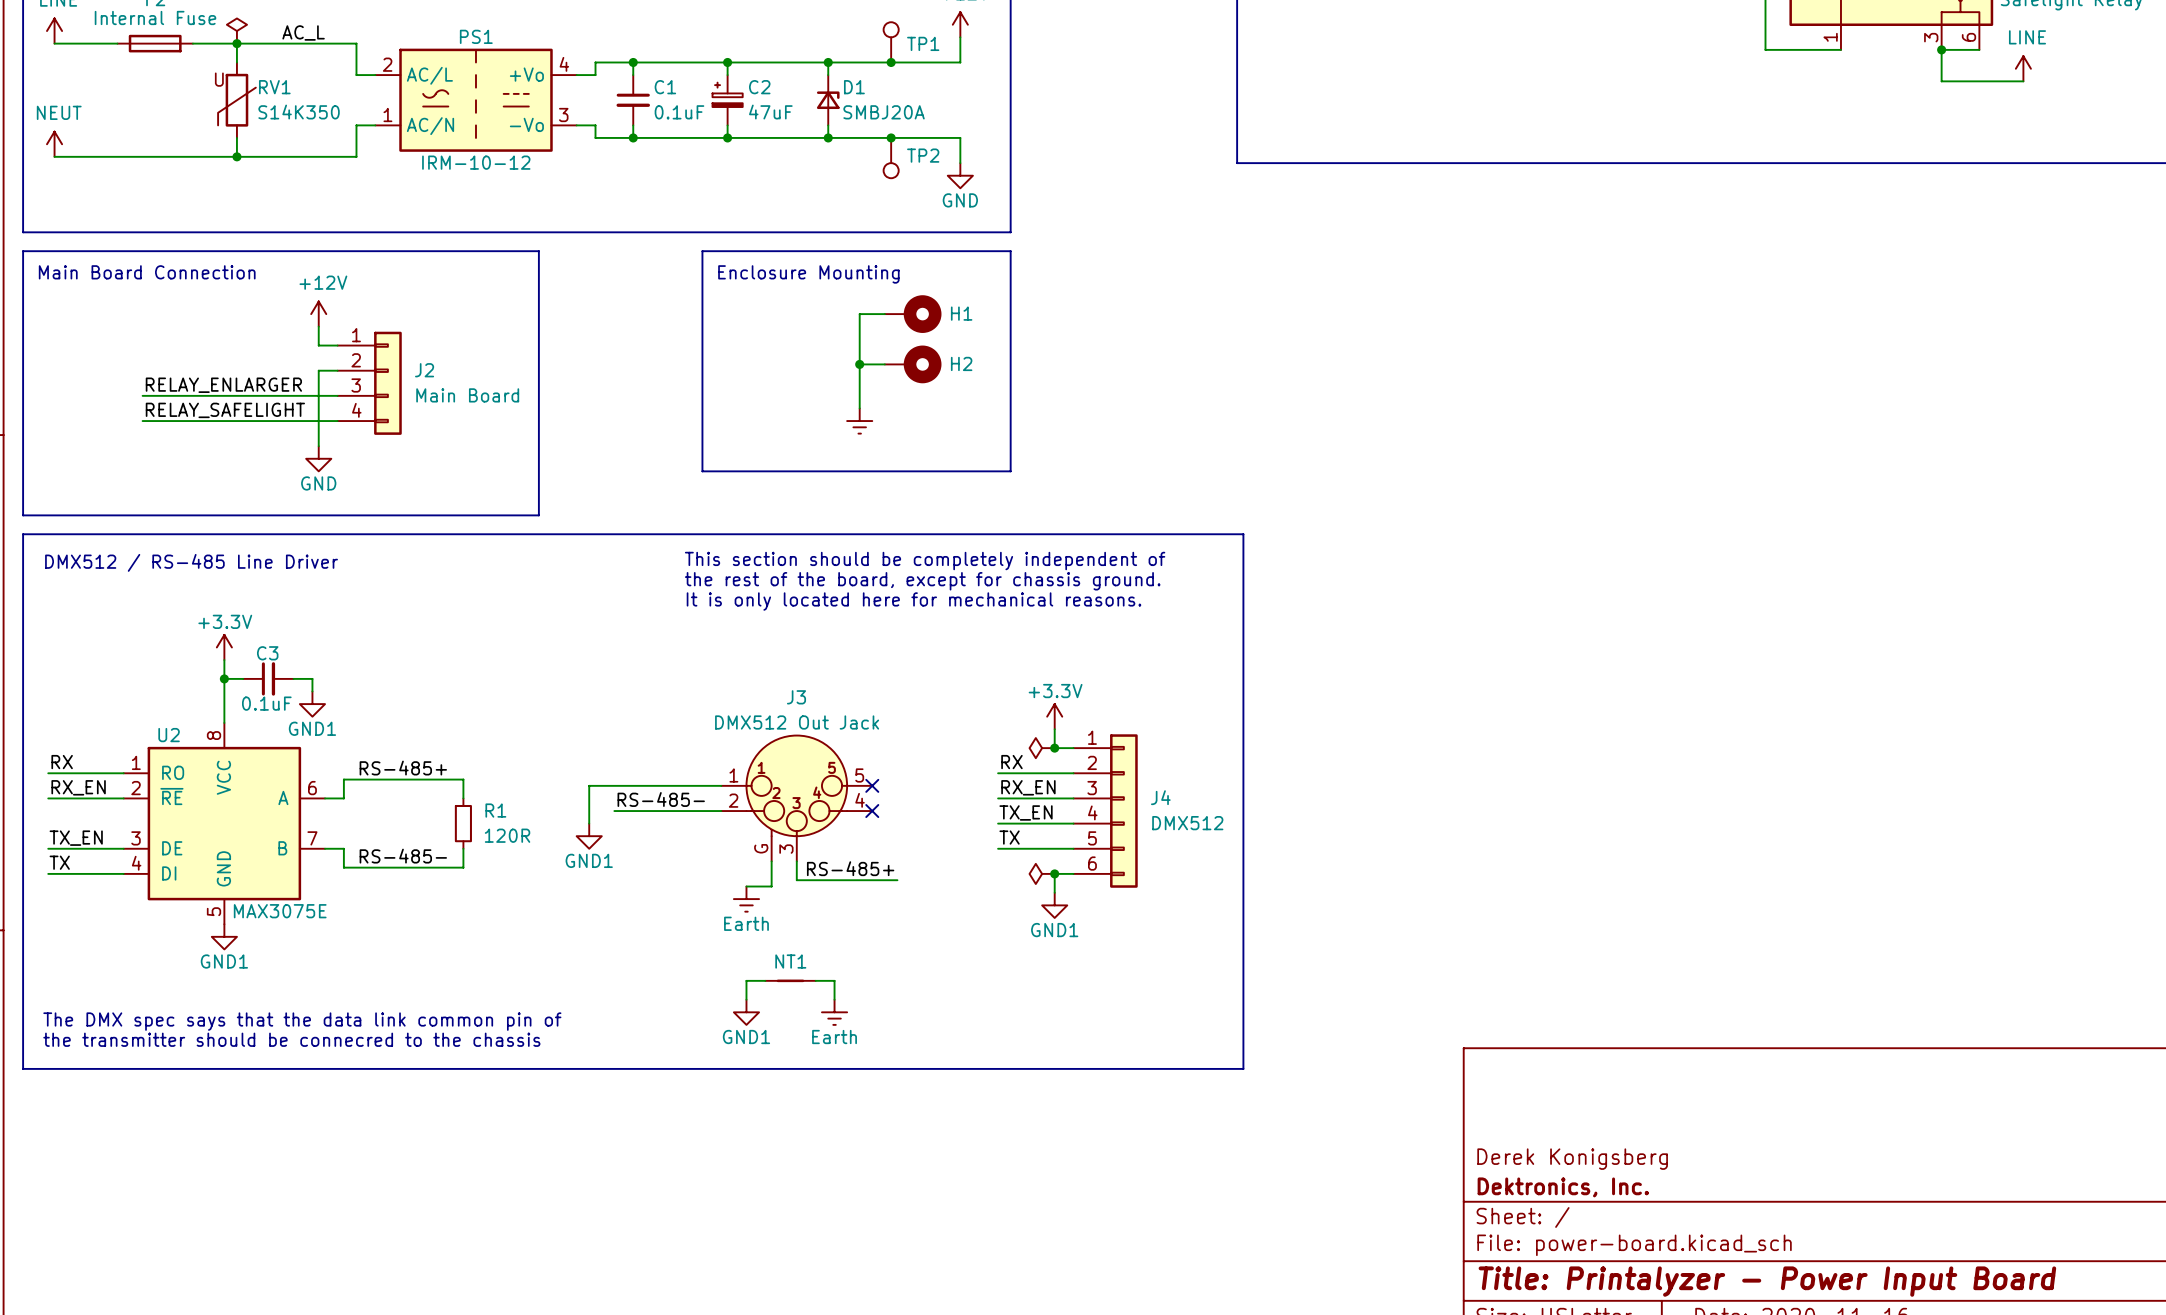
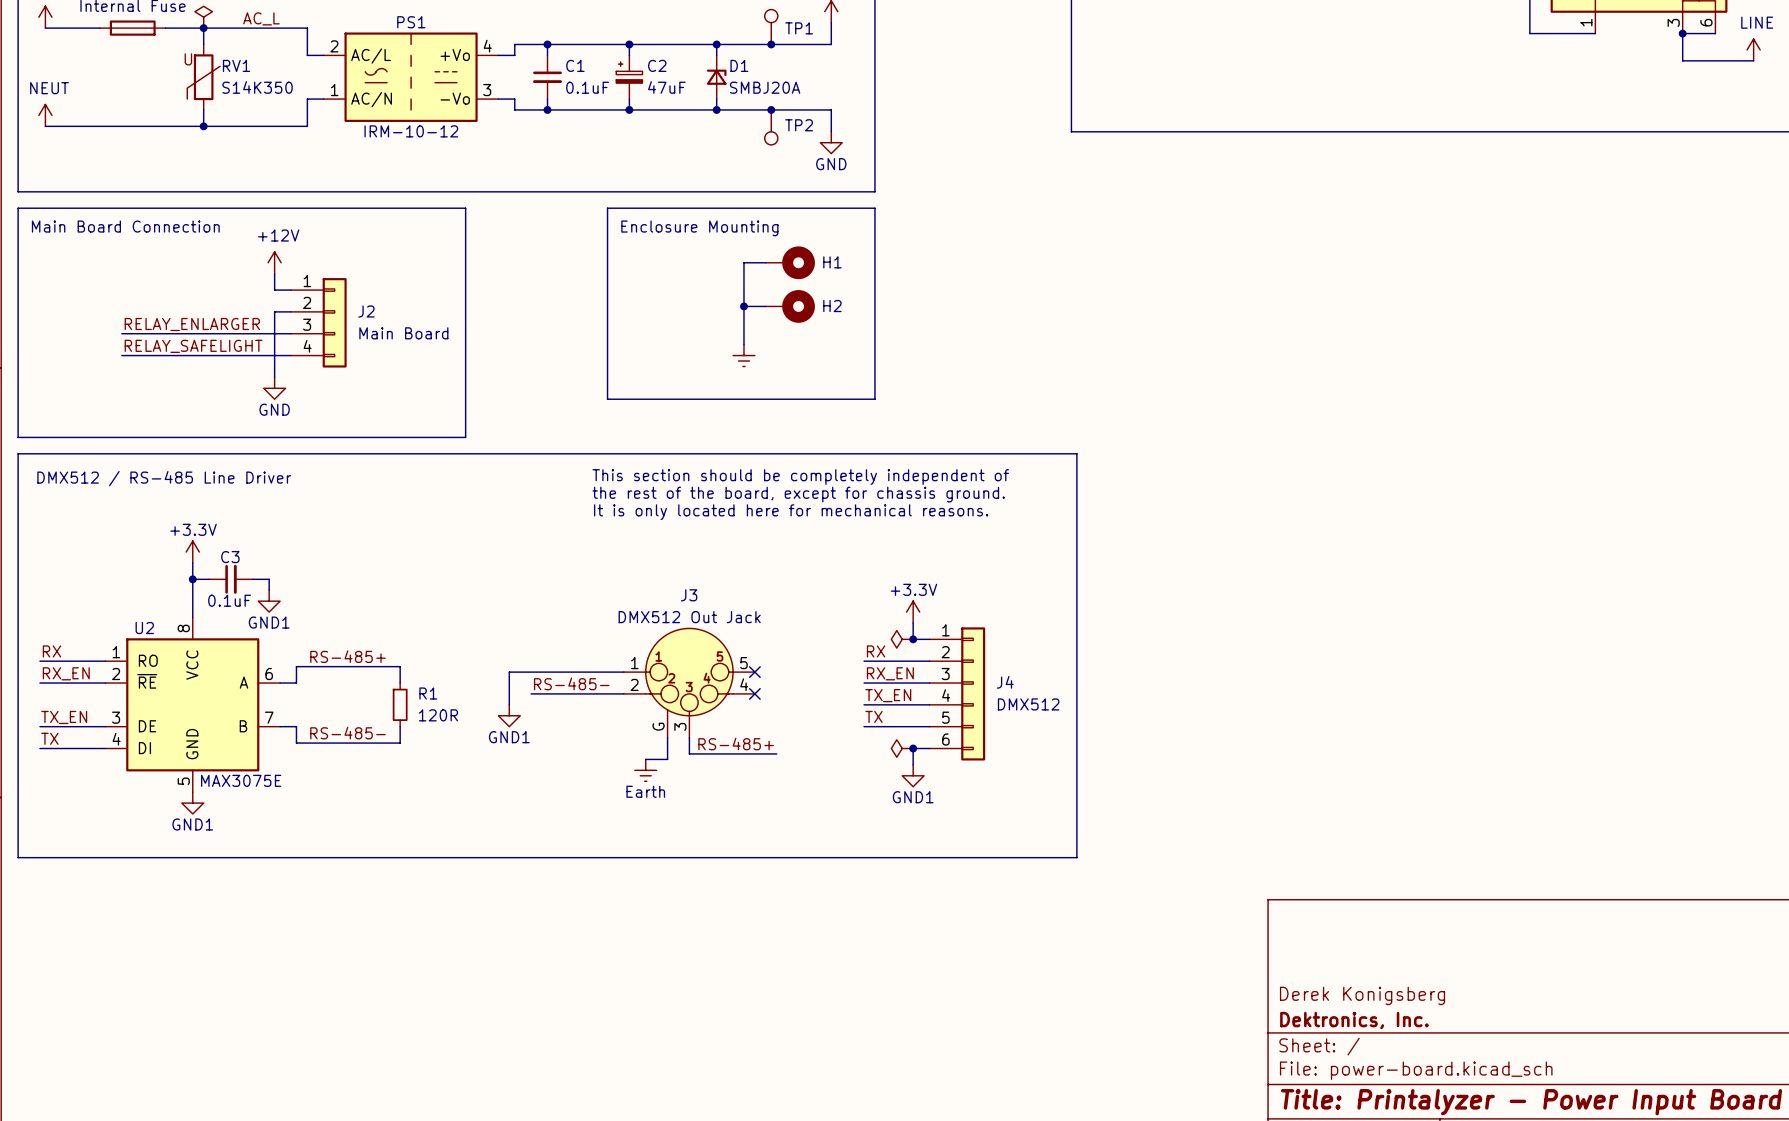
wire: (765, 980) (746, 980) (746, 999) -> none
NT1: (790, 980) -> none
wire: (815, 980) (834, 980) (834, 999) -> none
line: (23, 999) (23, 1068) (1243, 1068) (1243, 999) -> (18, 857) (1076, 857)
power symbol: GND1 (746, 1012) -> none
power symbol: Earth (834, 1012) -> none
text: The DMX spec says that the data link common pin of (302, 1021) -> none
text: the transmitter should be connecred to the chassis (291, 1039) -> none

